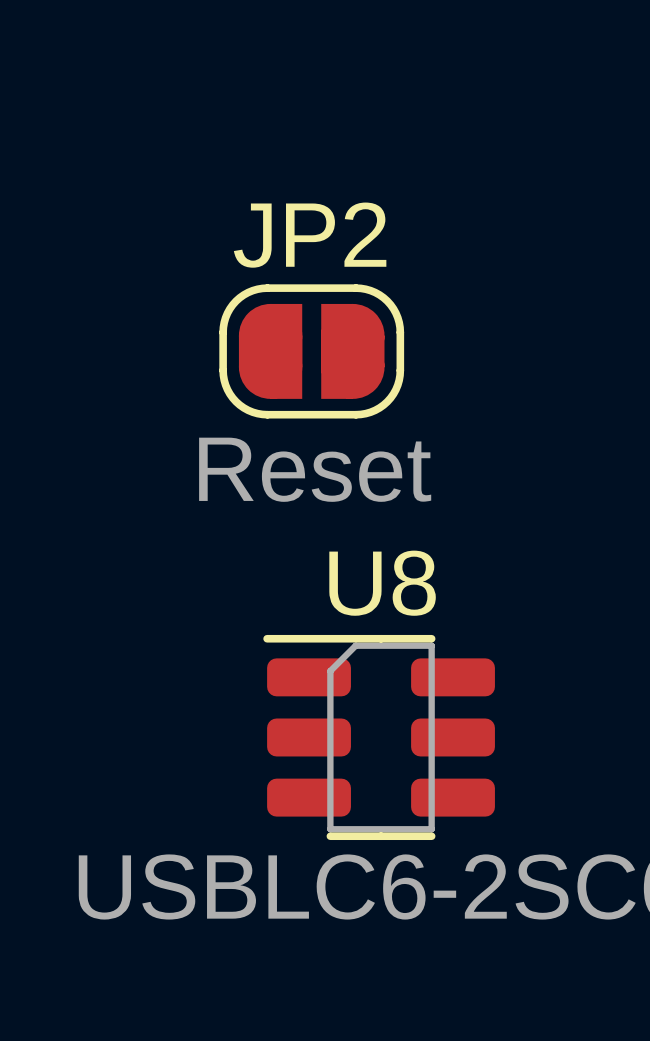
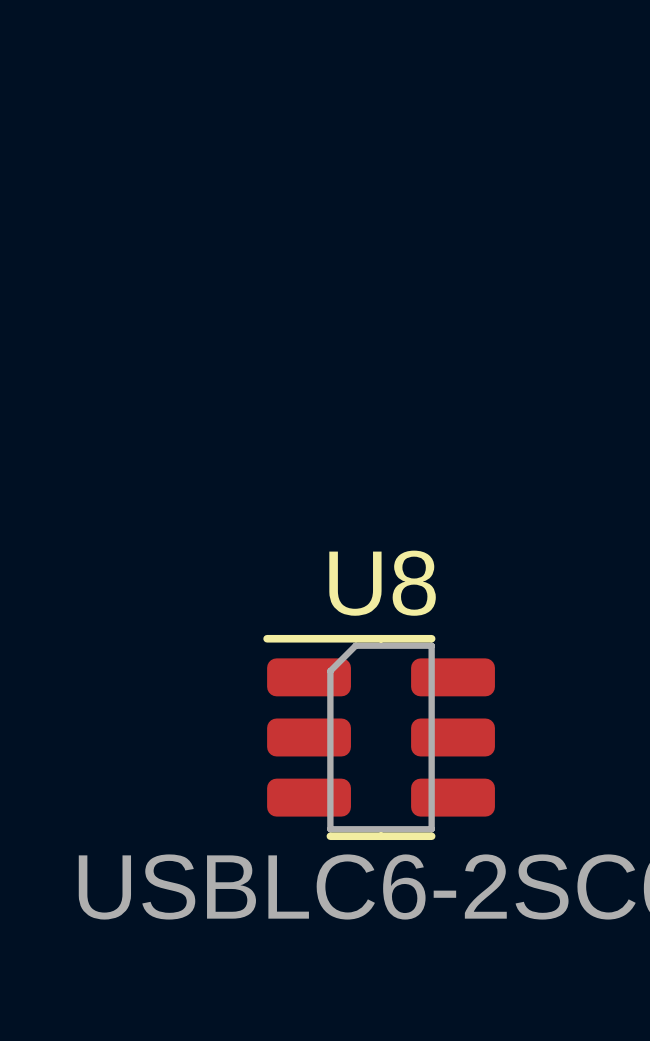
JP2: Reset (311, 351) -> none

